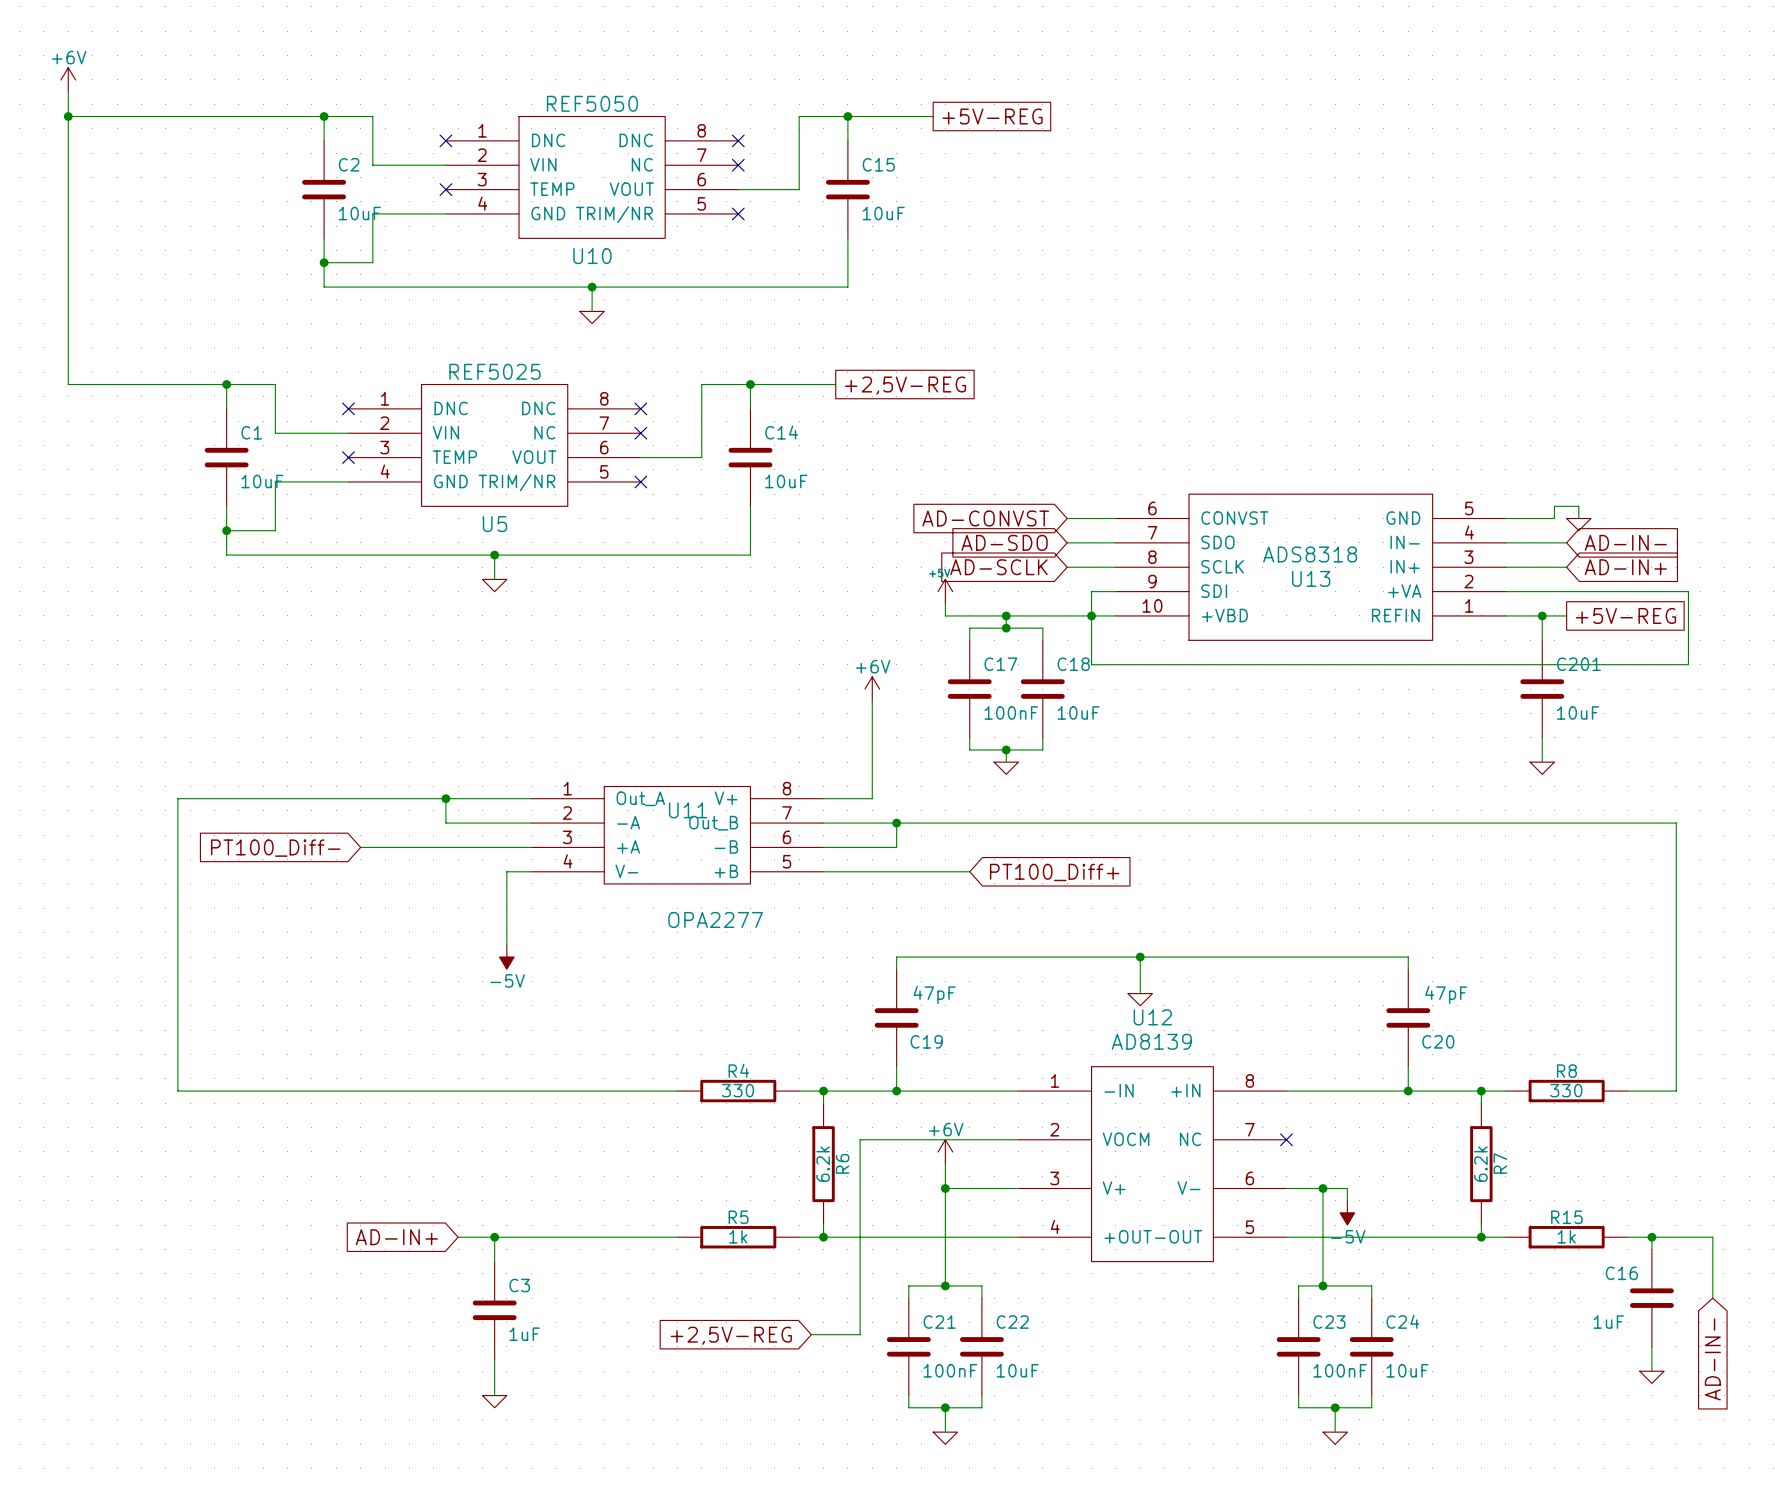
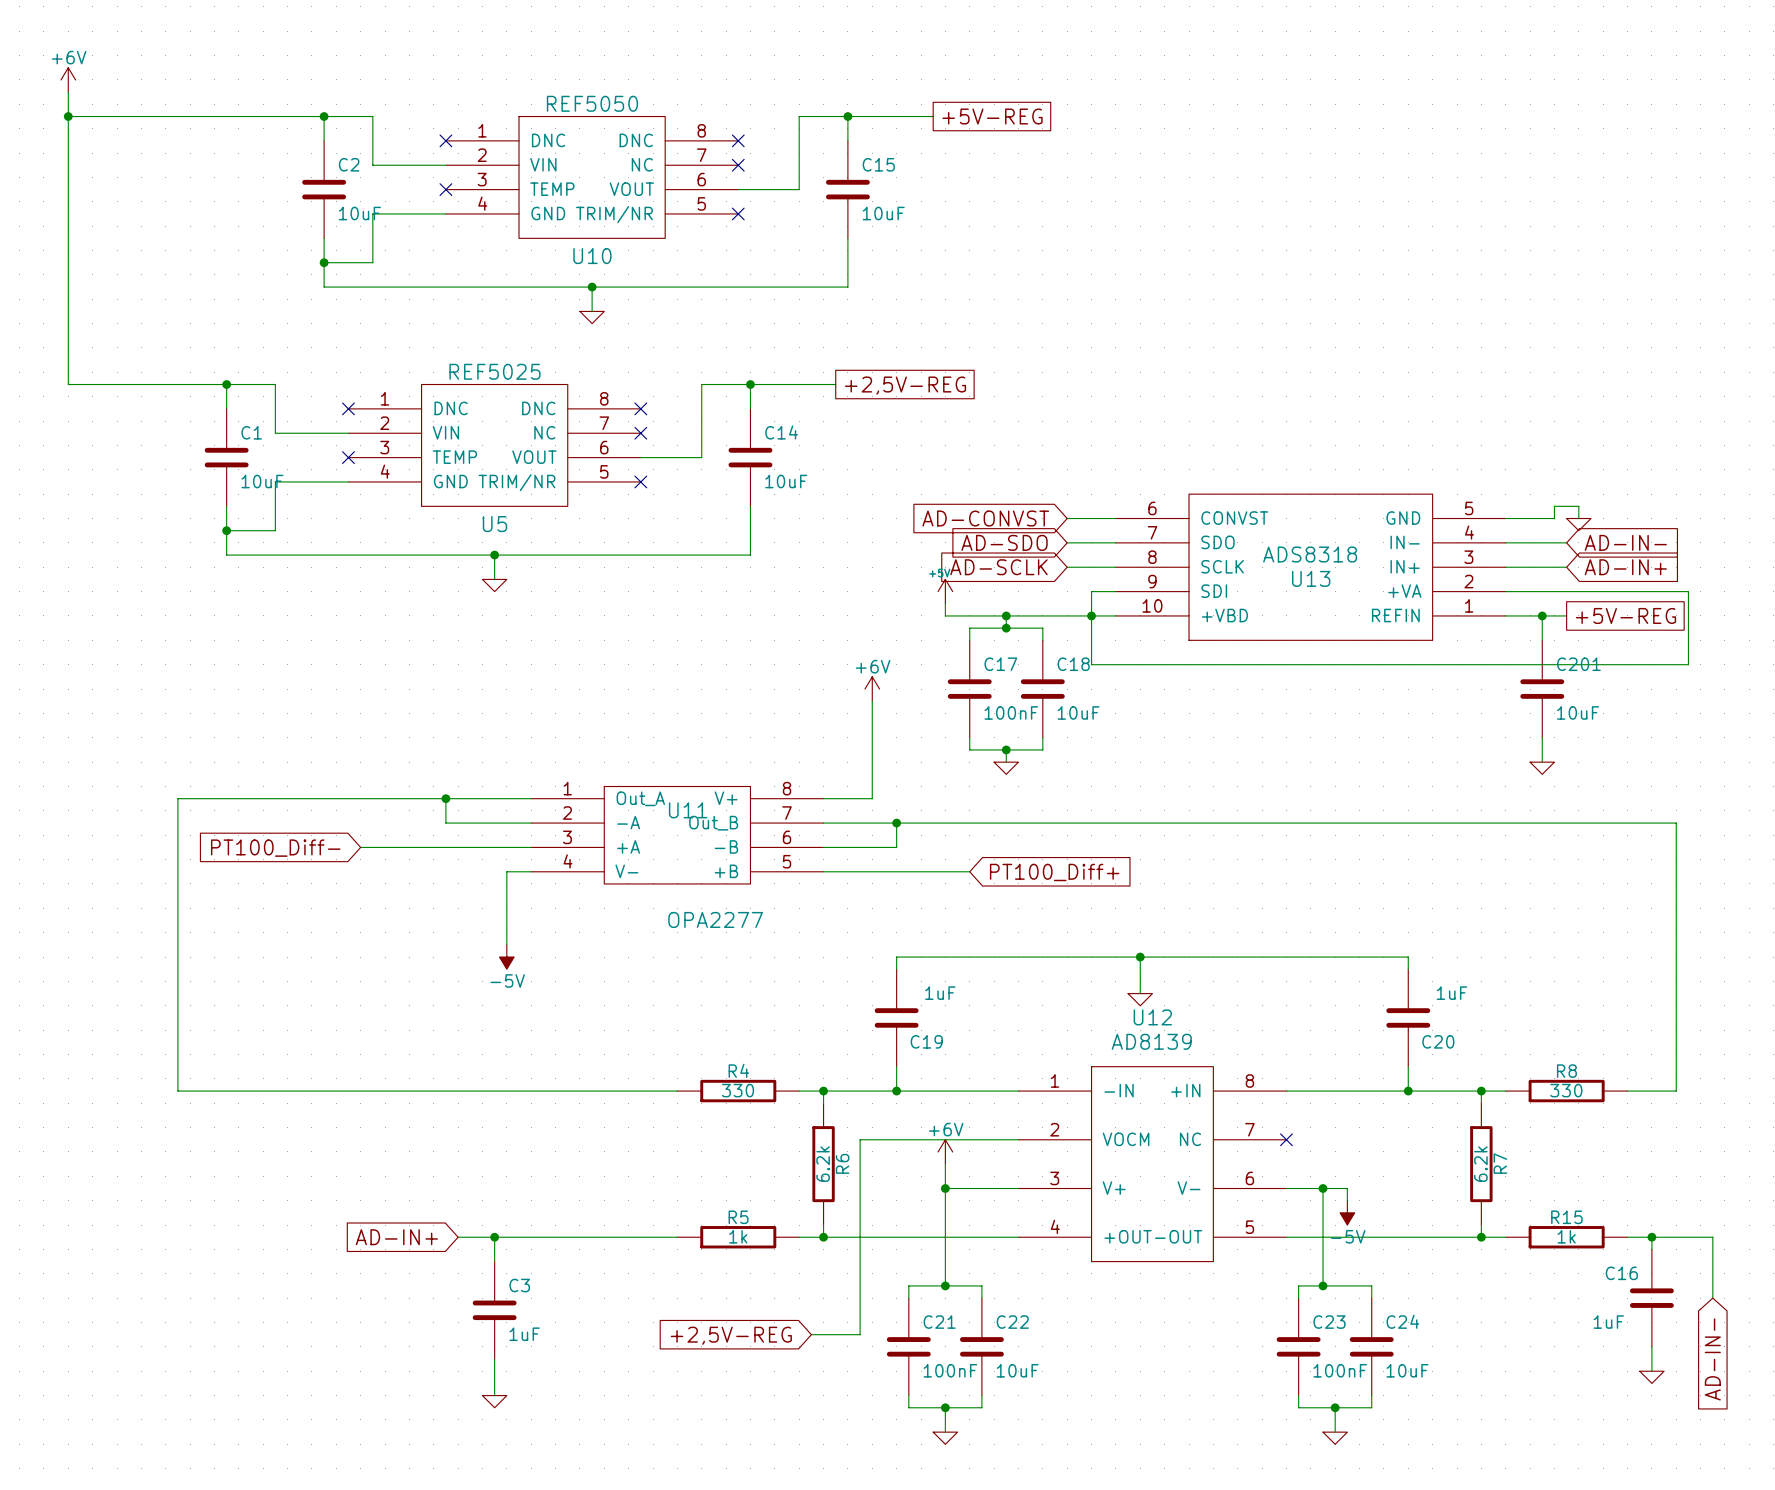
C19 value: 47pF (934, 994) -> 1uF (940, 993)
C20 value: 47pF (1446, 994) -> 1uF (1451, 993)

